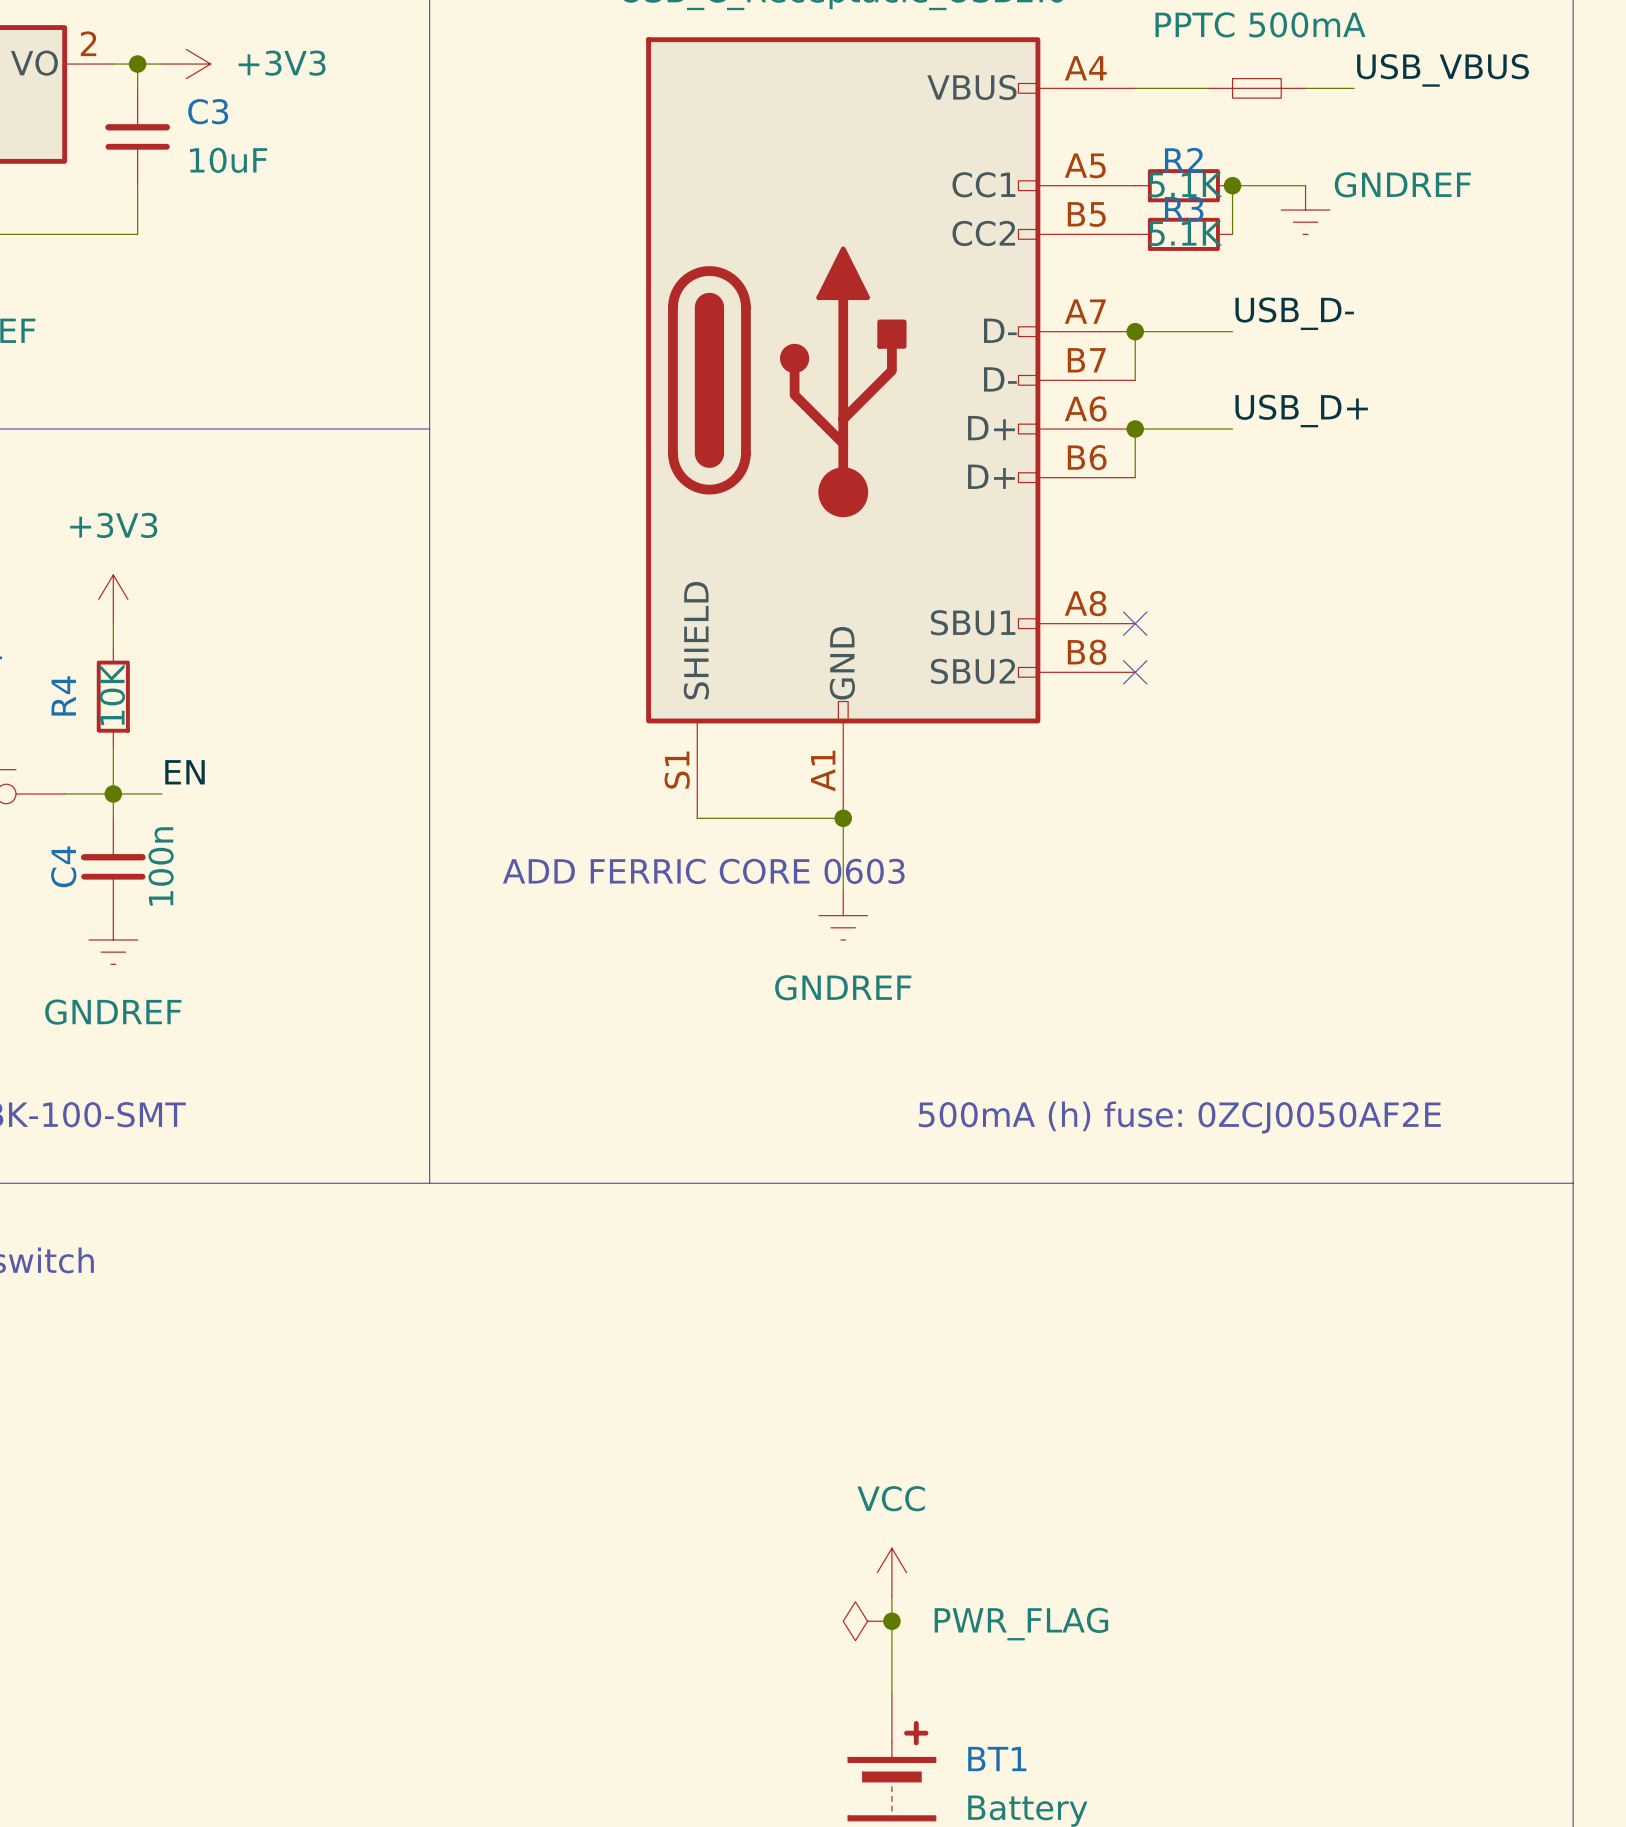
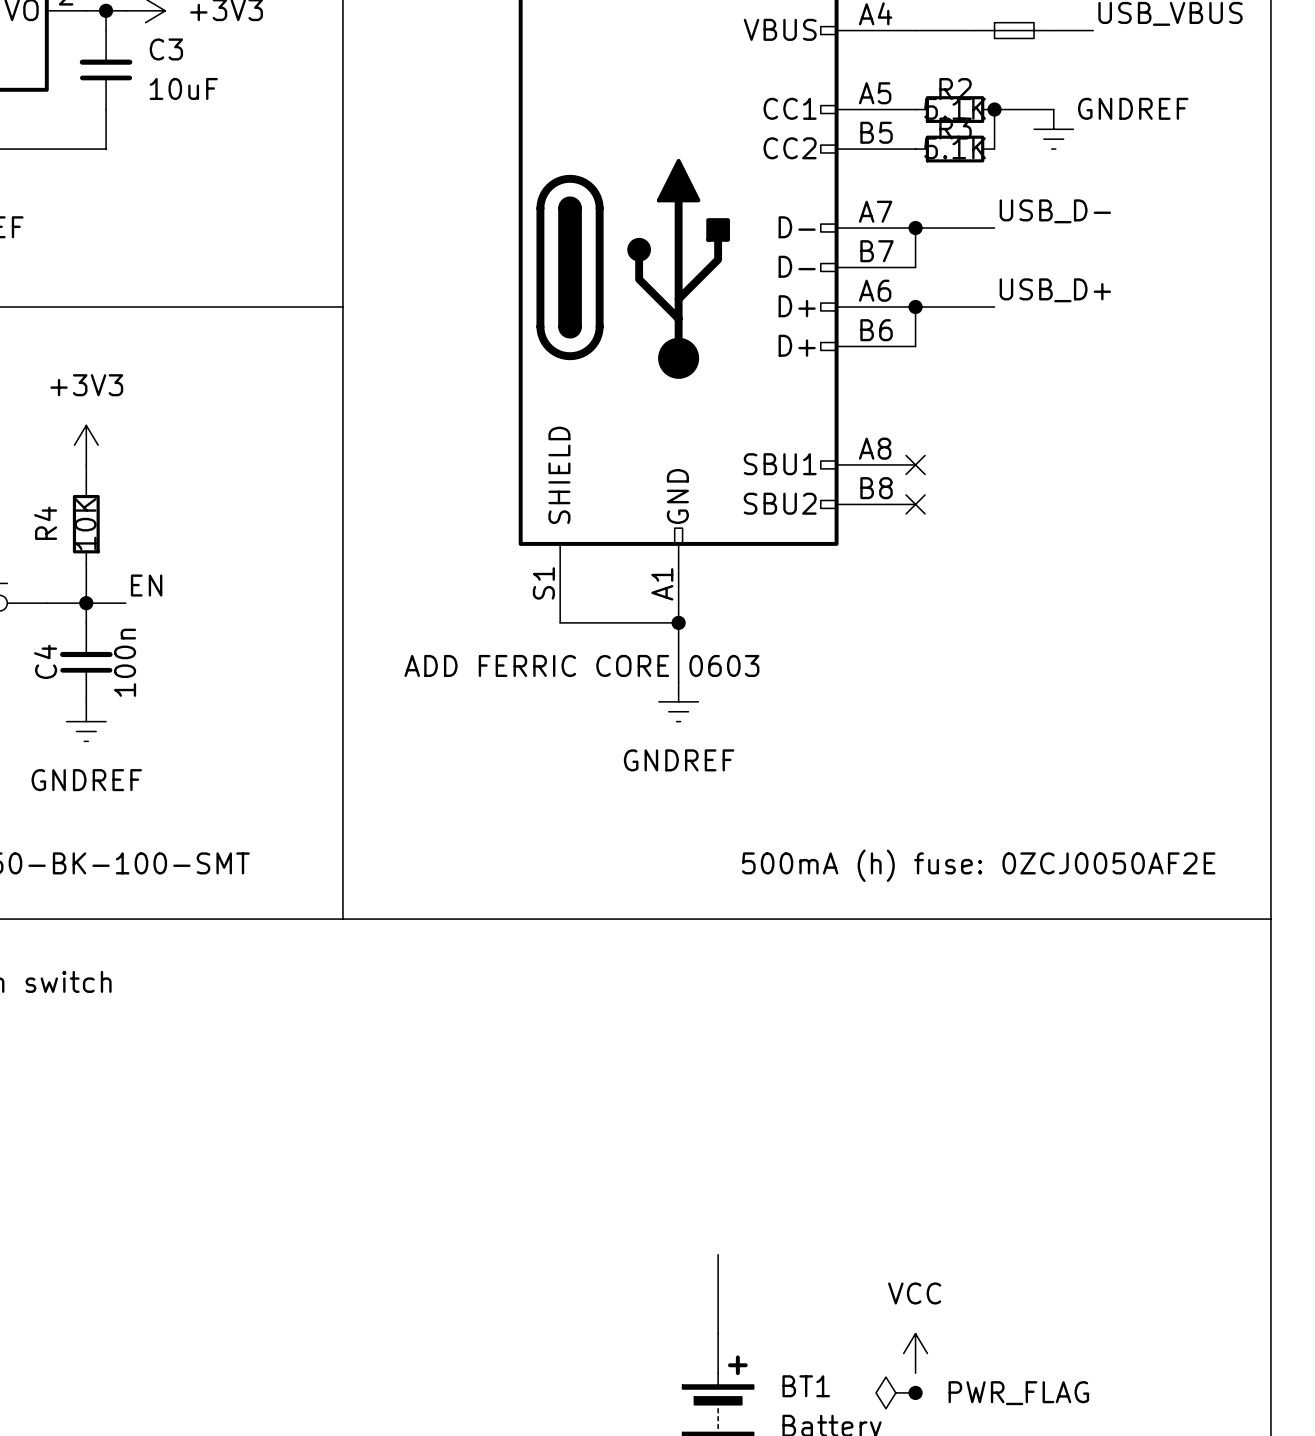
power symbol position: VCC (891, 1572) -> VCC (915, 1353)
power symbol position: PWR_FLAG (867, 1621) -> PWR_FLAG (895, 1392)
junction: (891, 1621) -> none
junction: none -> (915, 1392)

